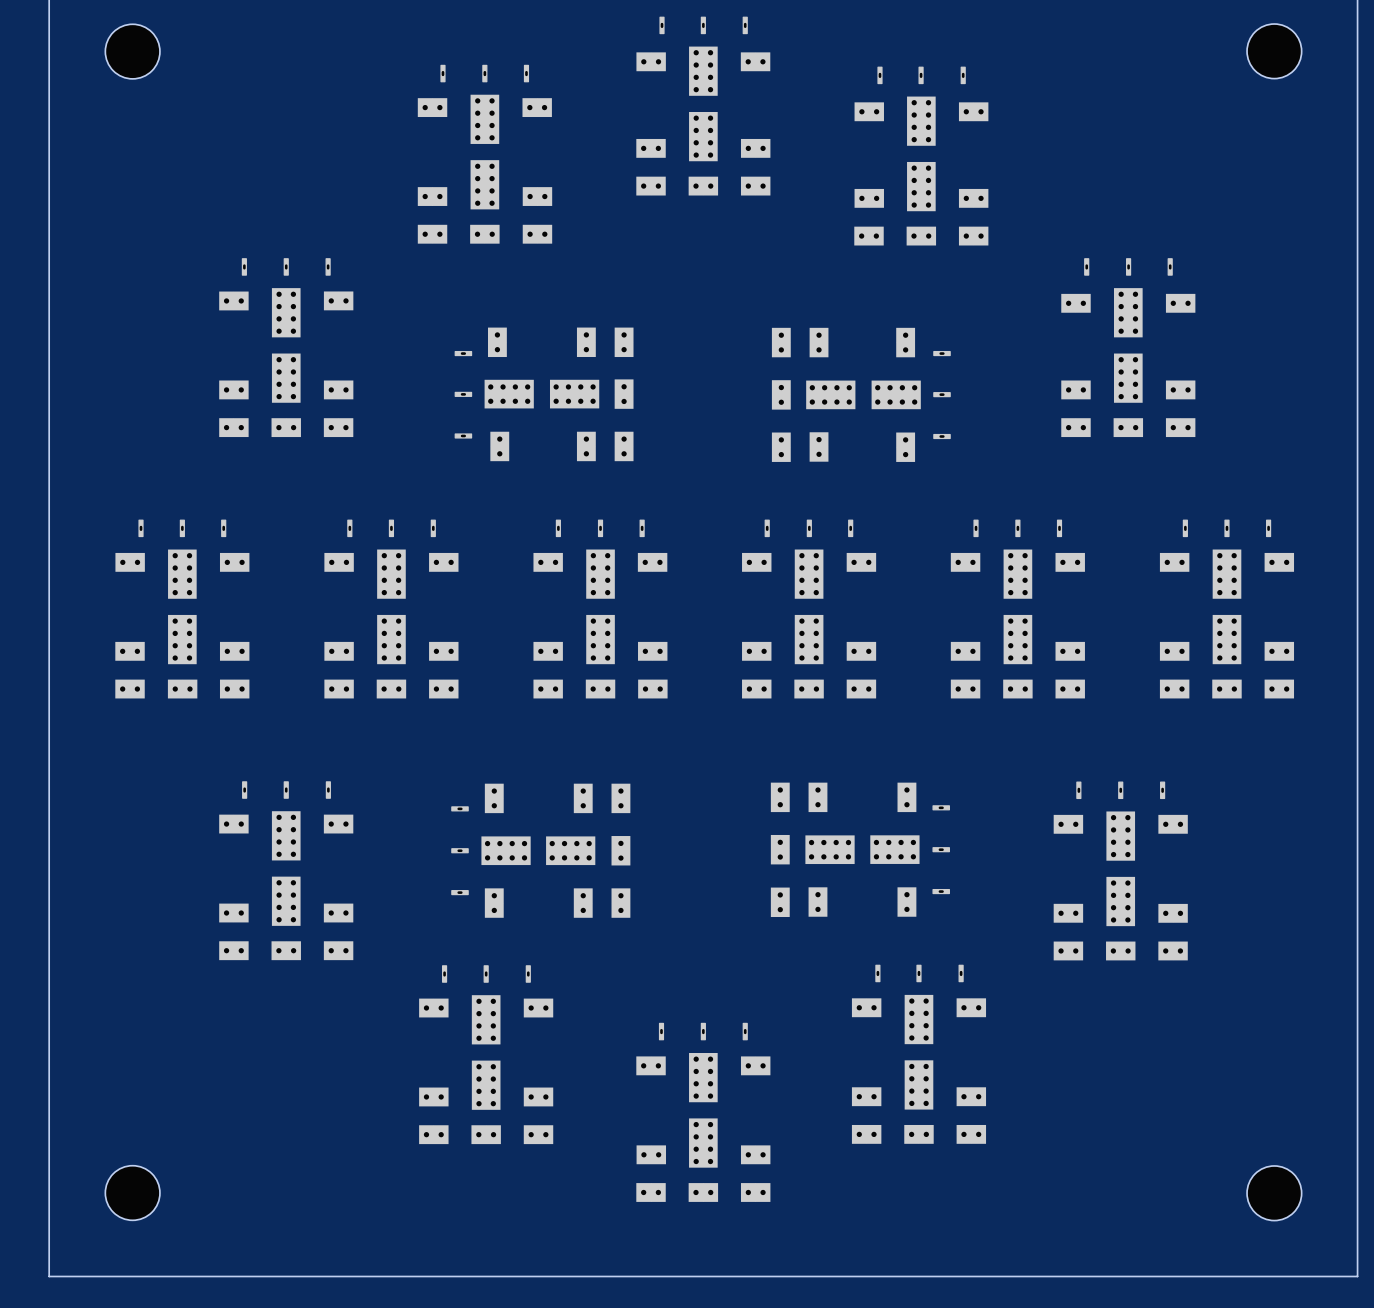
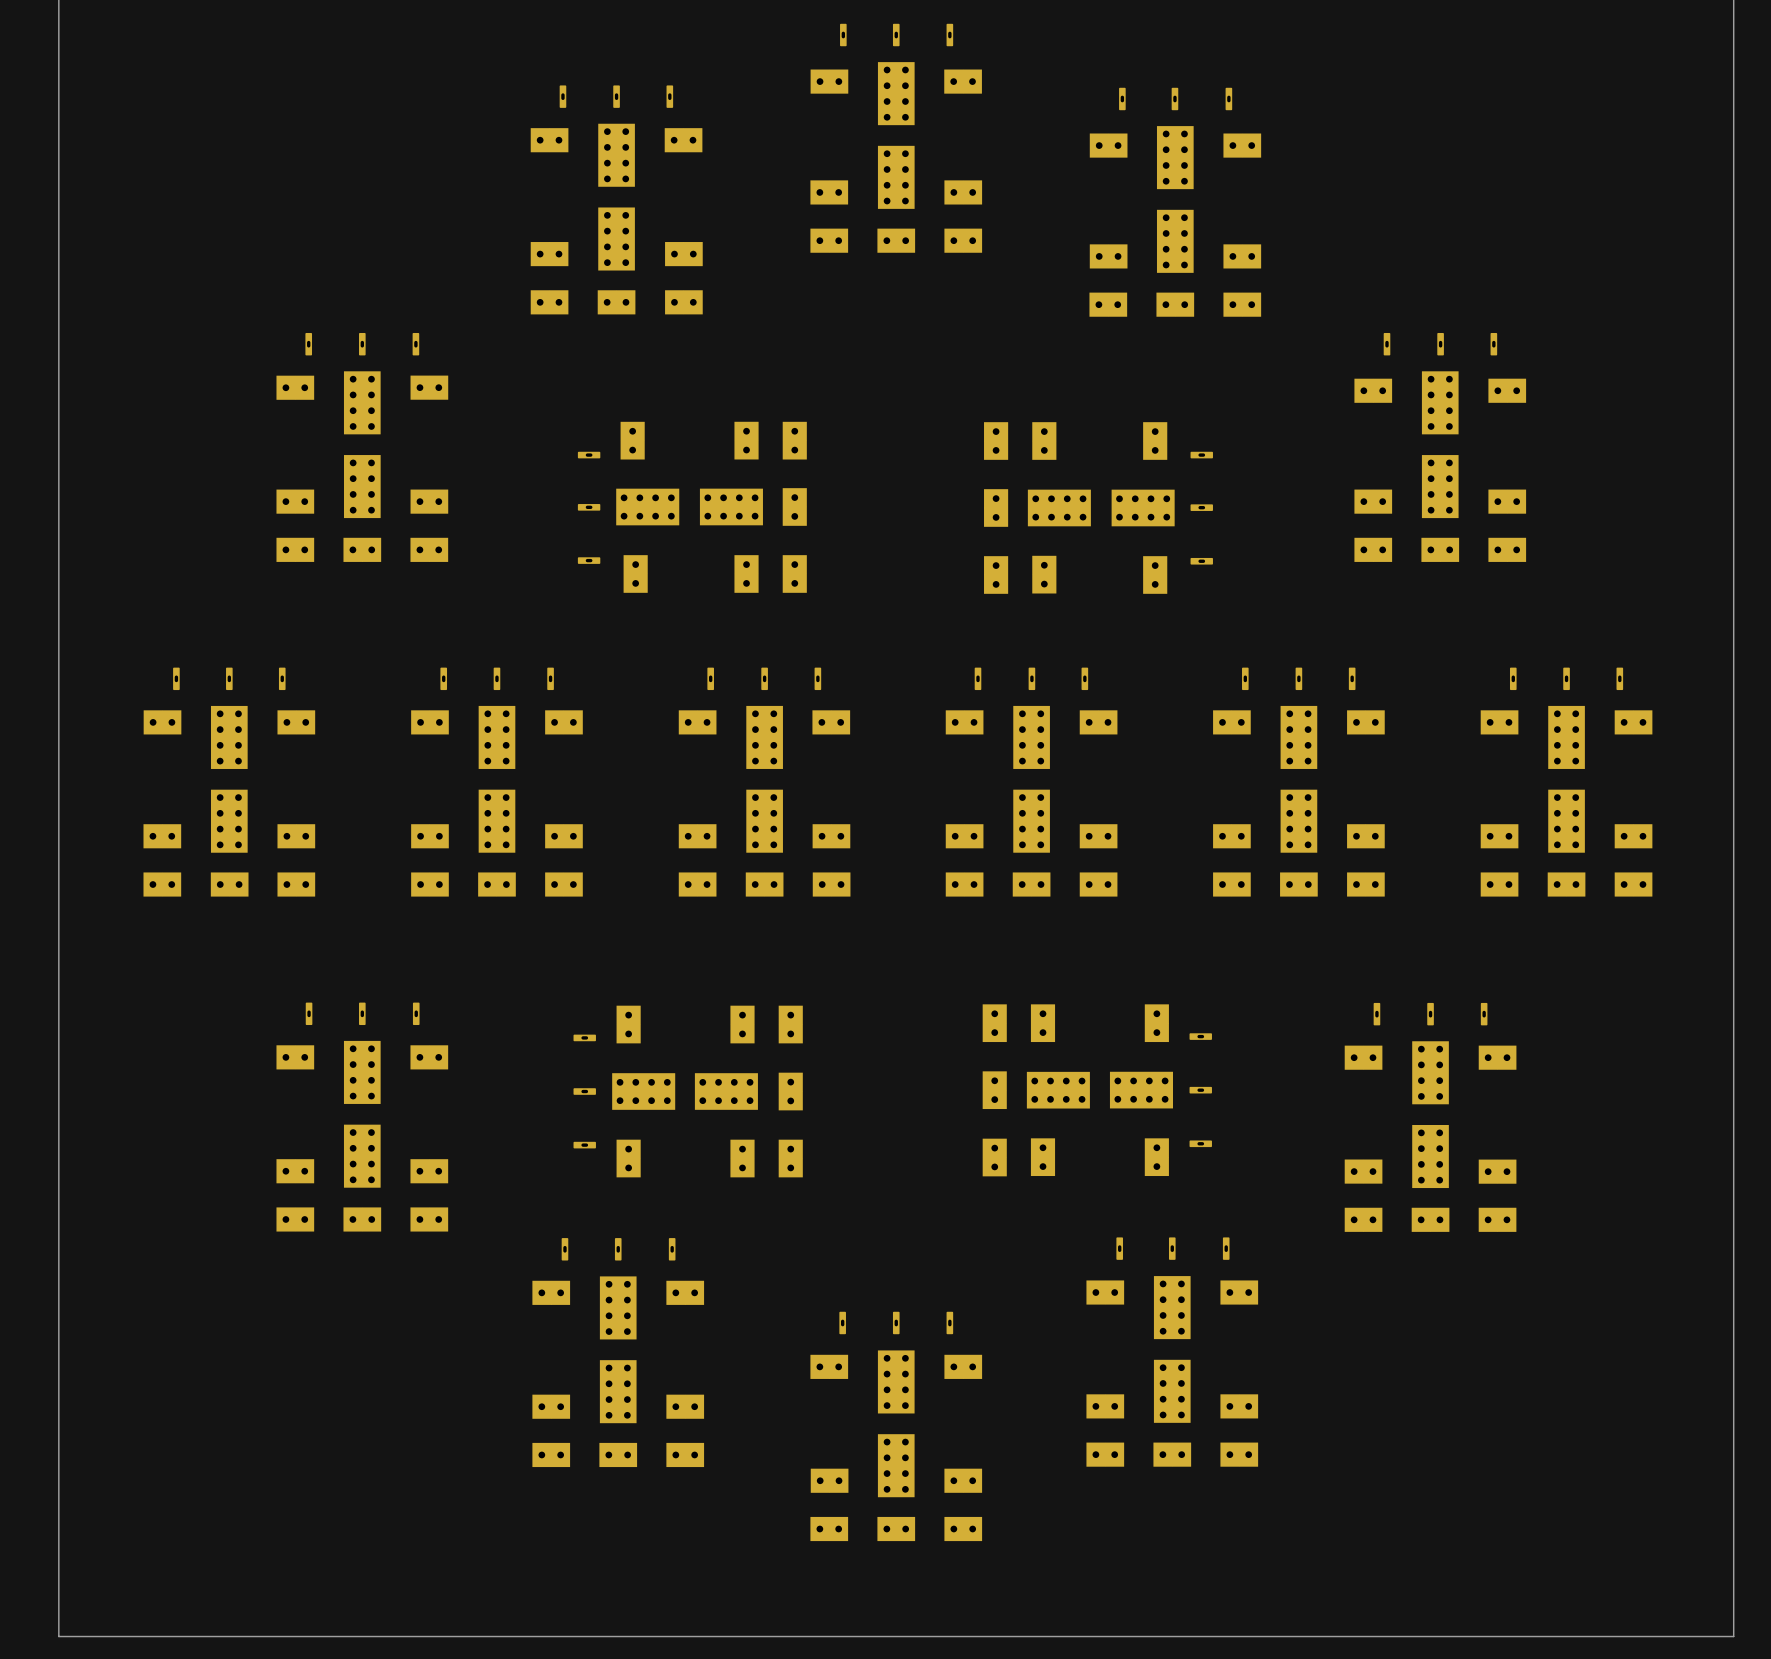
part: (132, 51) -> none
part: (1274, 51) -> none
part: (132, 1193) -> none
part: (1274, 1193) -> none

